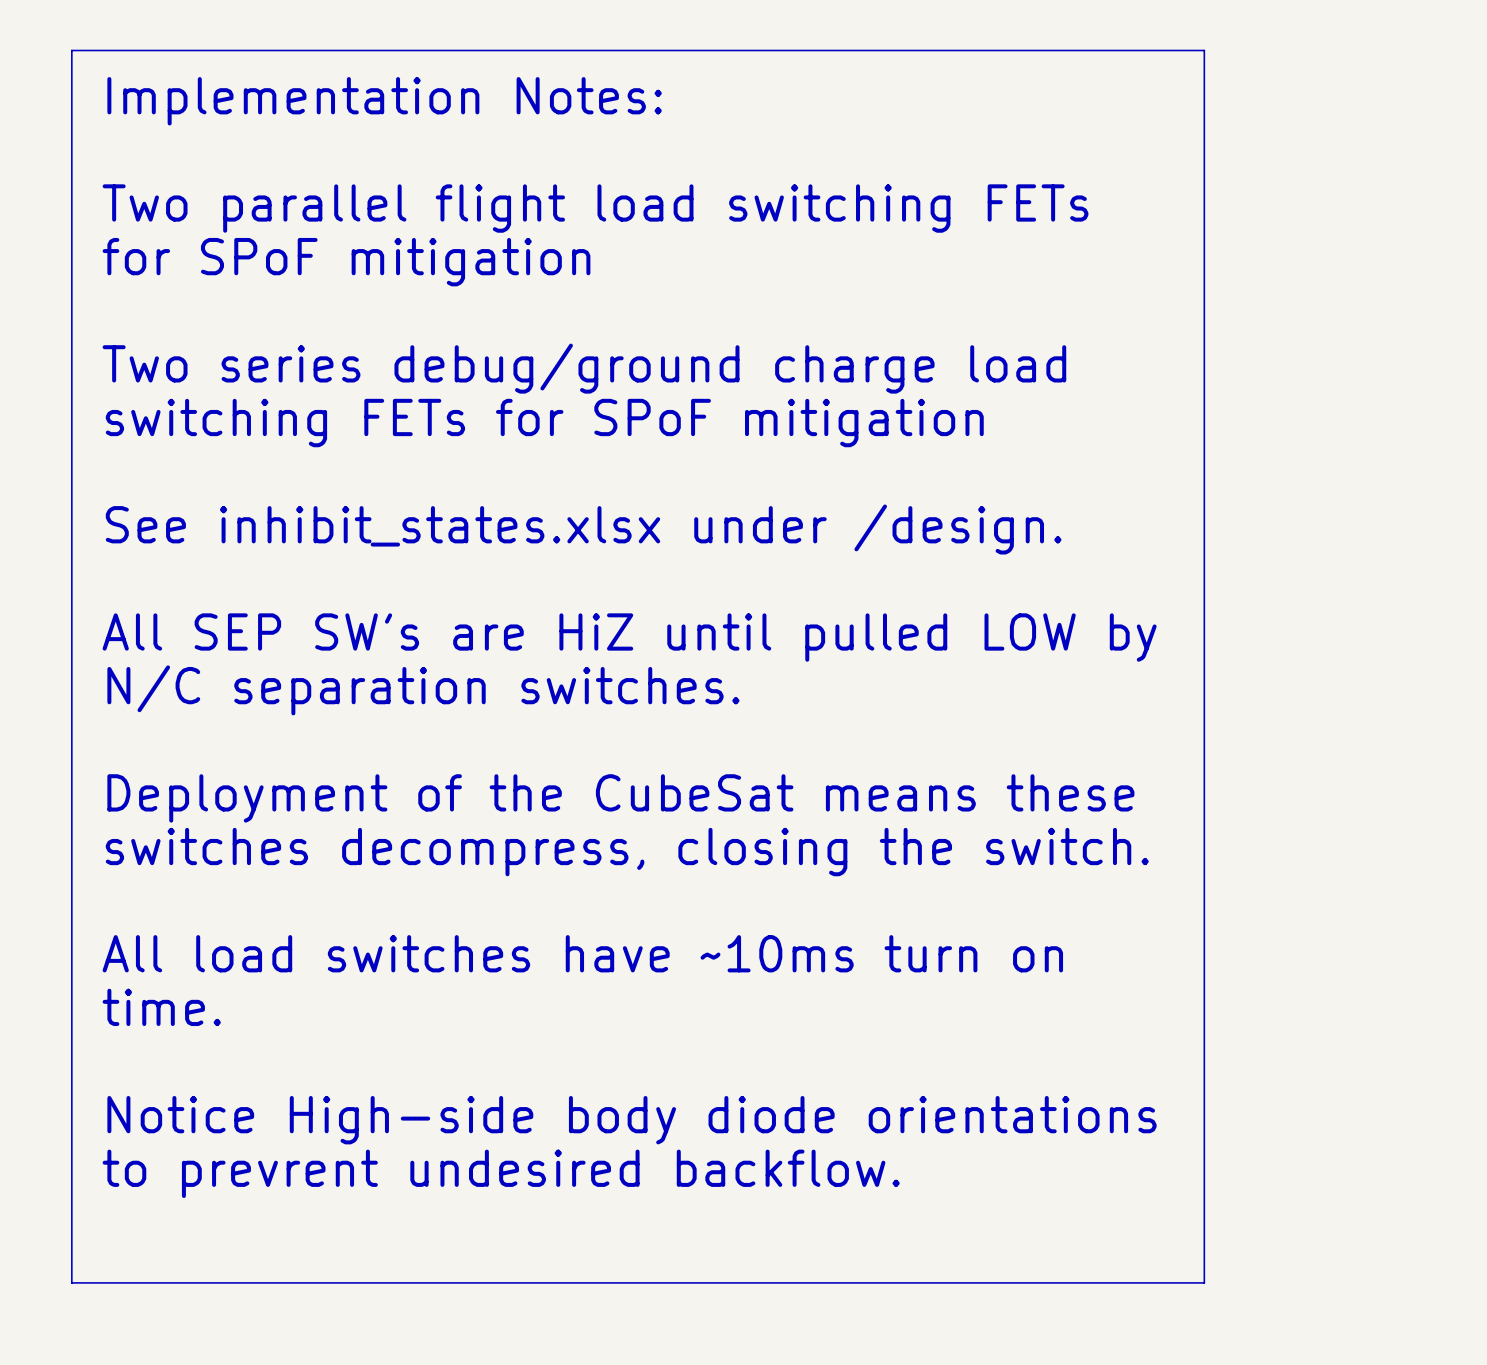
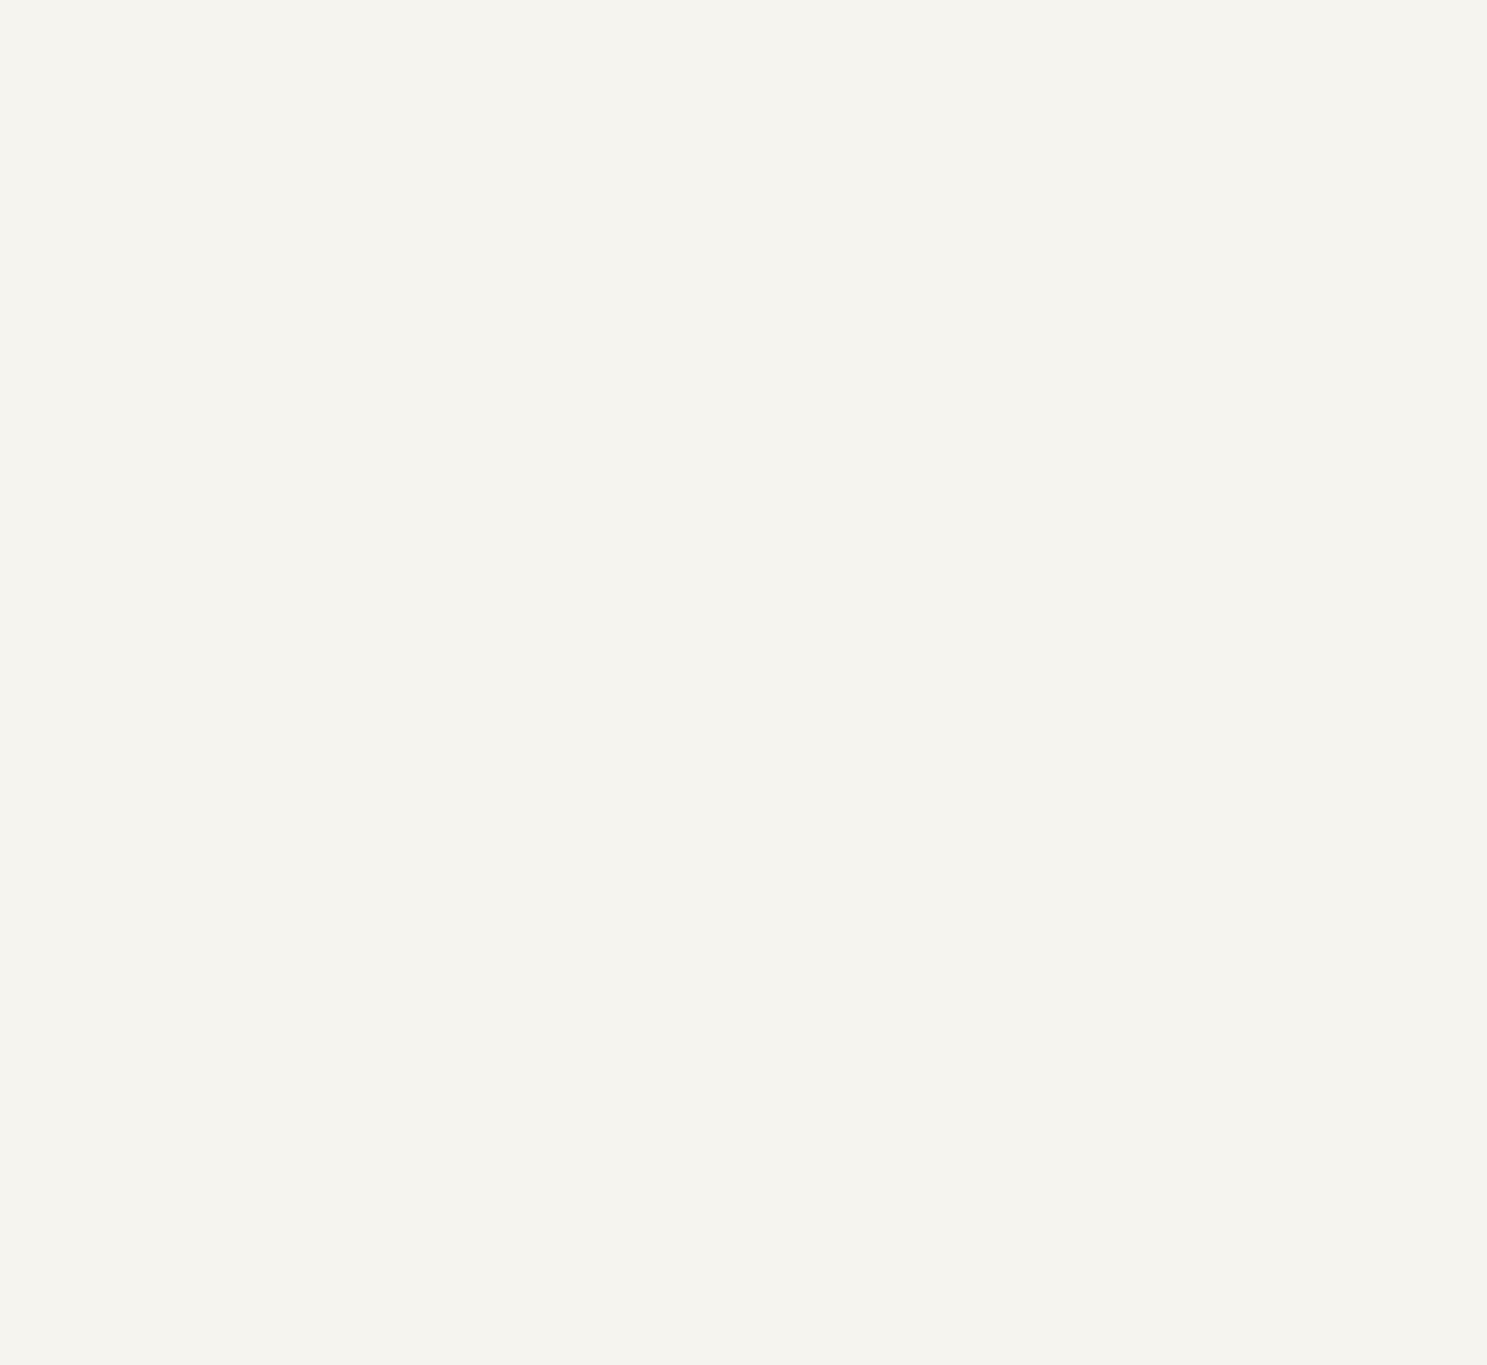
line: (71, 50) (1204, 50) (1204, 1282) (71, 1282) (71, 50) -> none
text: Implementation Notes: (384, 101) -> none
text: Two parallel flight load switching FETs (595, 208) -> none
text: for SPoF mitigation (346, 262) -> none
text: Two series debug/ground charge load (584, 368) -> none
text: switching FETs for SPoF mitigation (544, 423) -> none
text: See inhibit_states.xlsx under /design. (583, 529) -> none
text: All SEP SW's are HiZ until pulled LOW by (629, 637) -> none
text: N/C separation switches. (423, 690) -> none
text: Deployment of the CubeSat means these (620, 798) -> none
text: switches decompress, closing the switch. (627, 852) -> none
text: All load switches have ~10ms turn on (582, 953) -> none
text: time. (161, 1007) -> none
text: Notice High-side body diode orientations (632, 1120) -> none
text: to prevrent undesired backflow. (501, 1173) -> none

